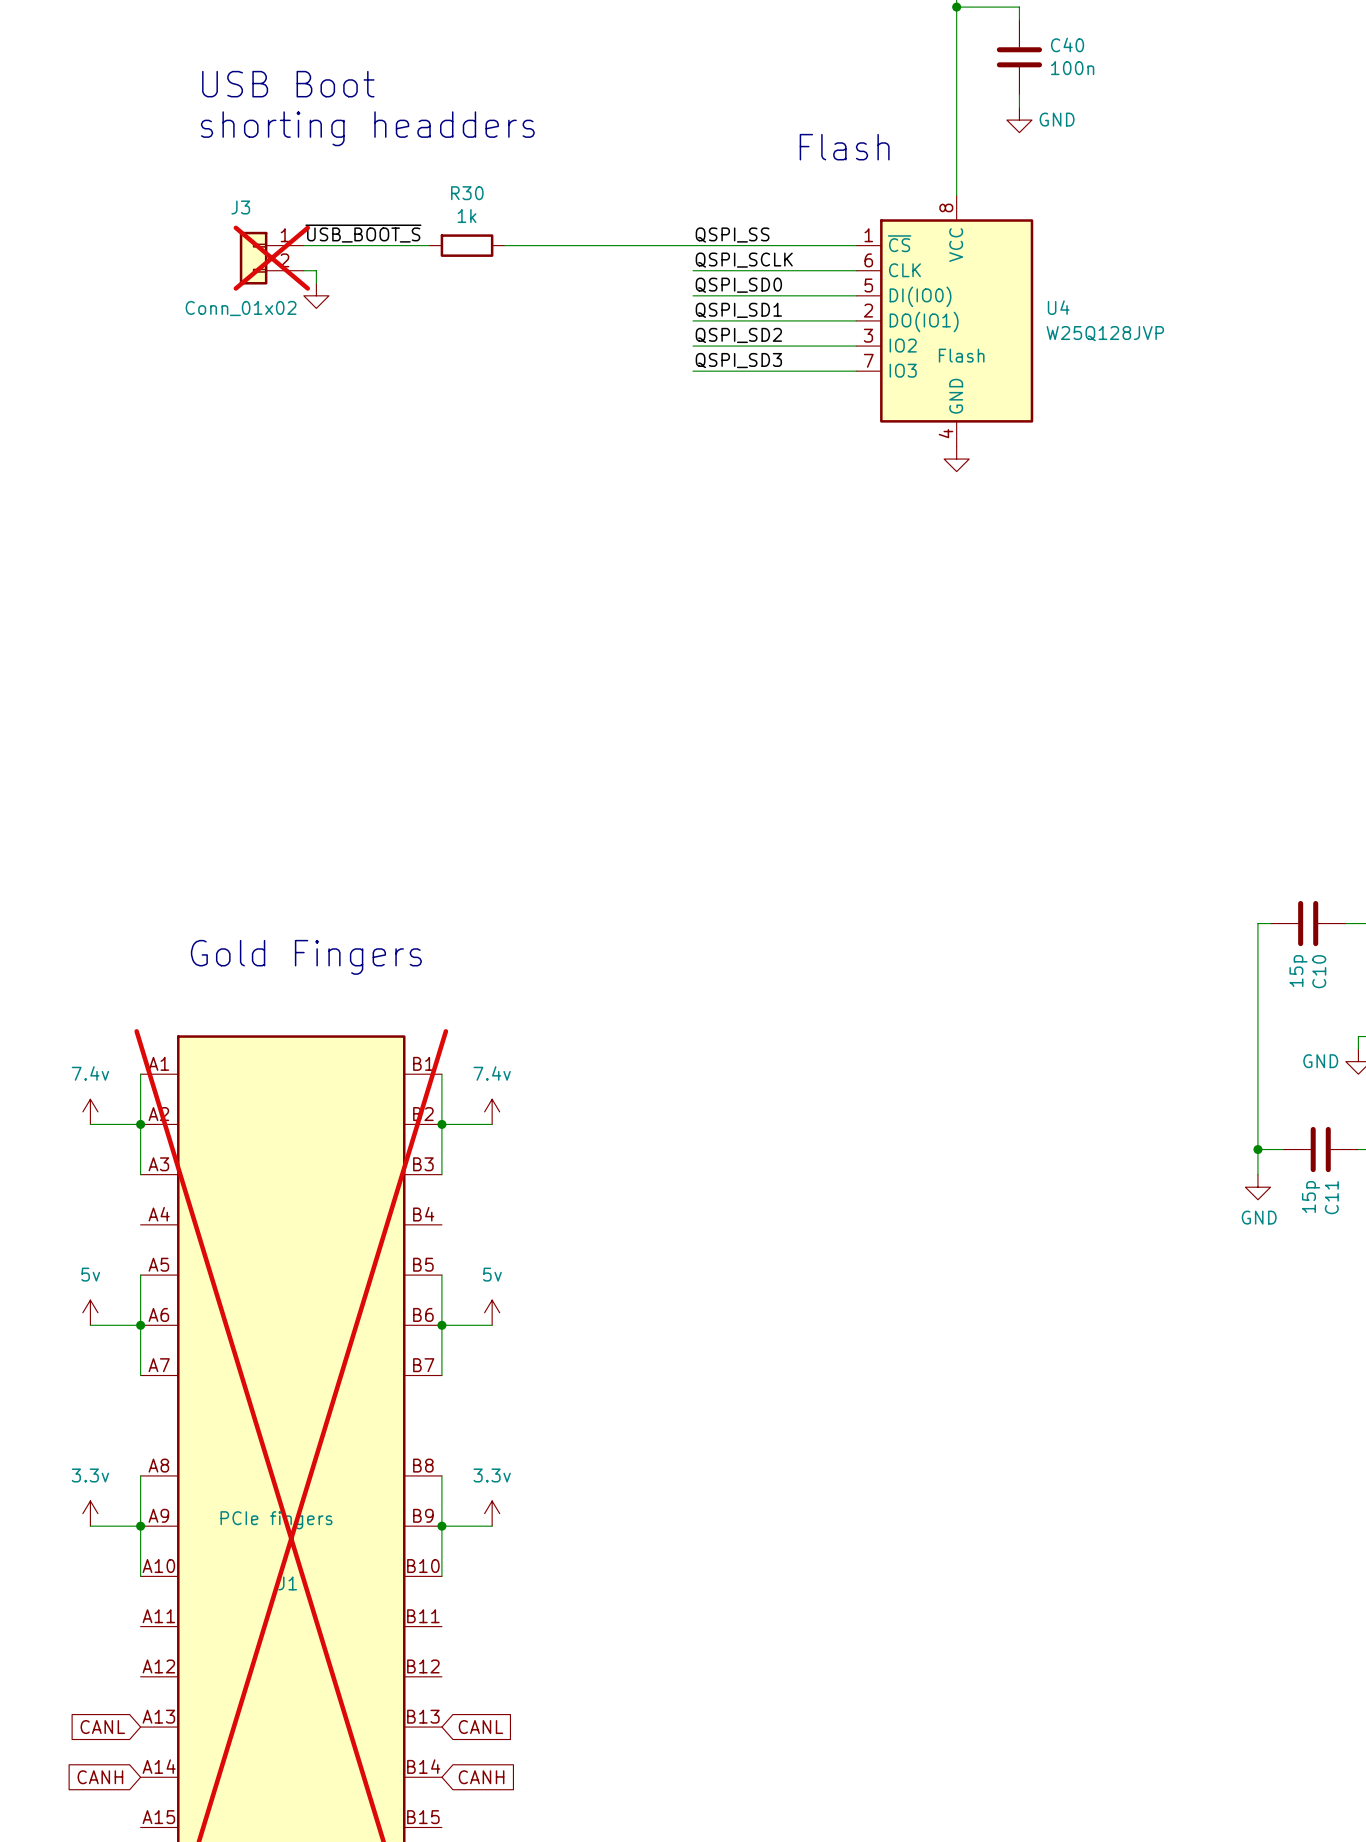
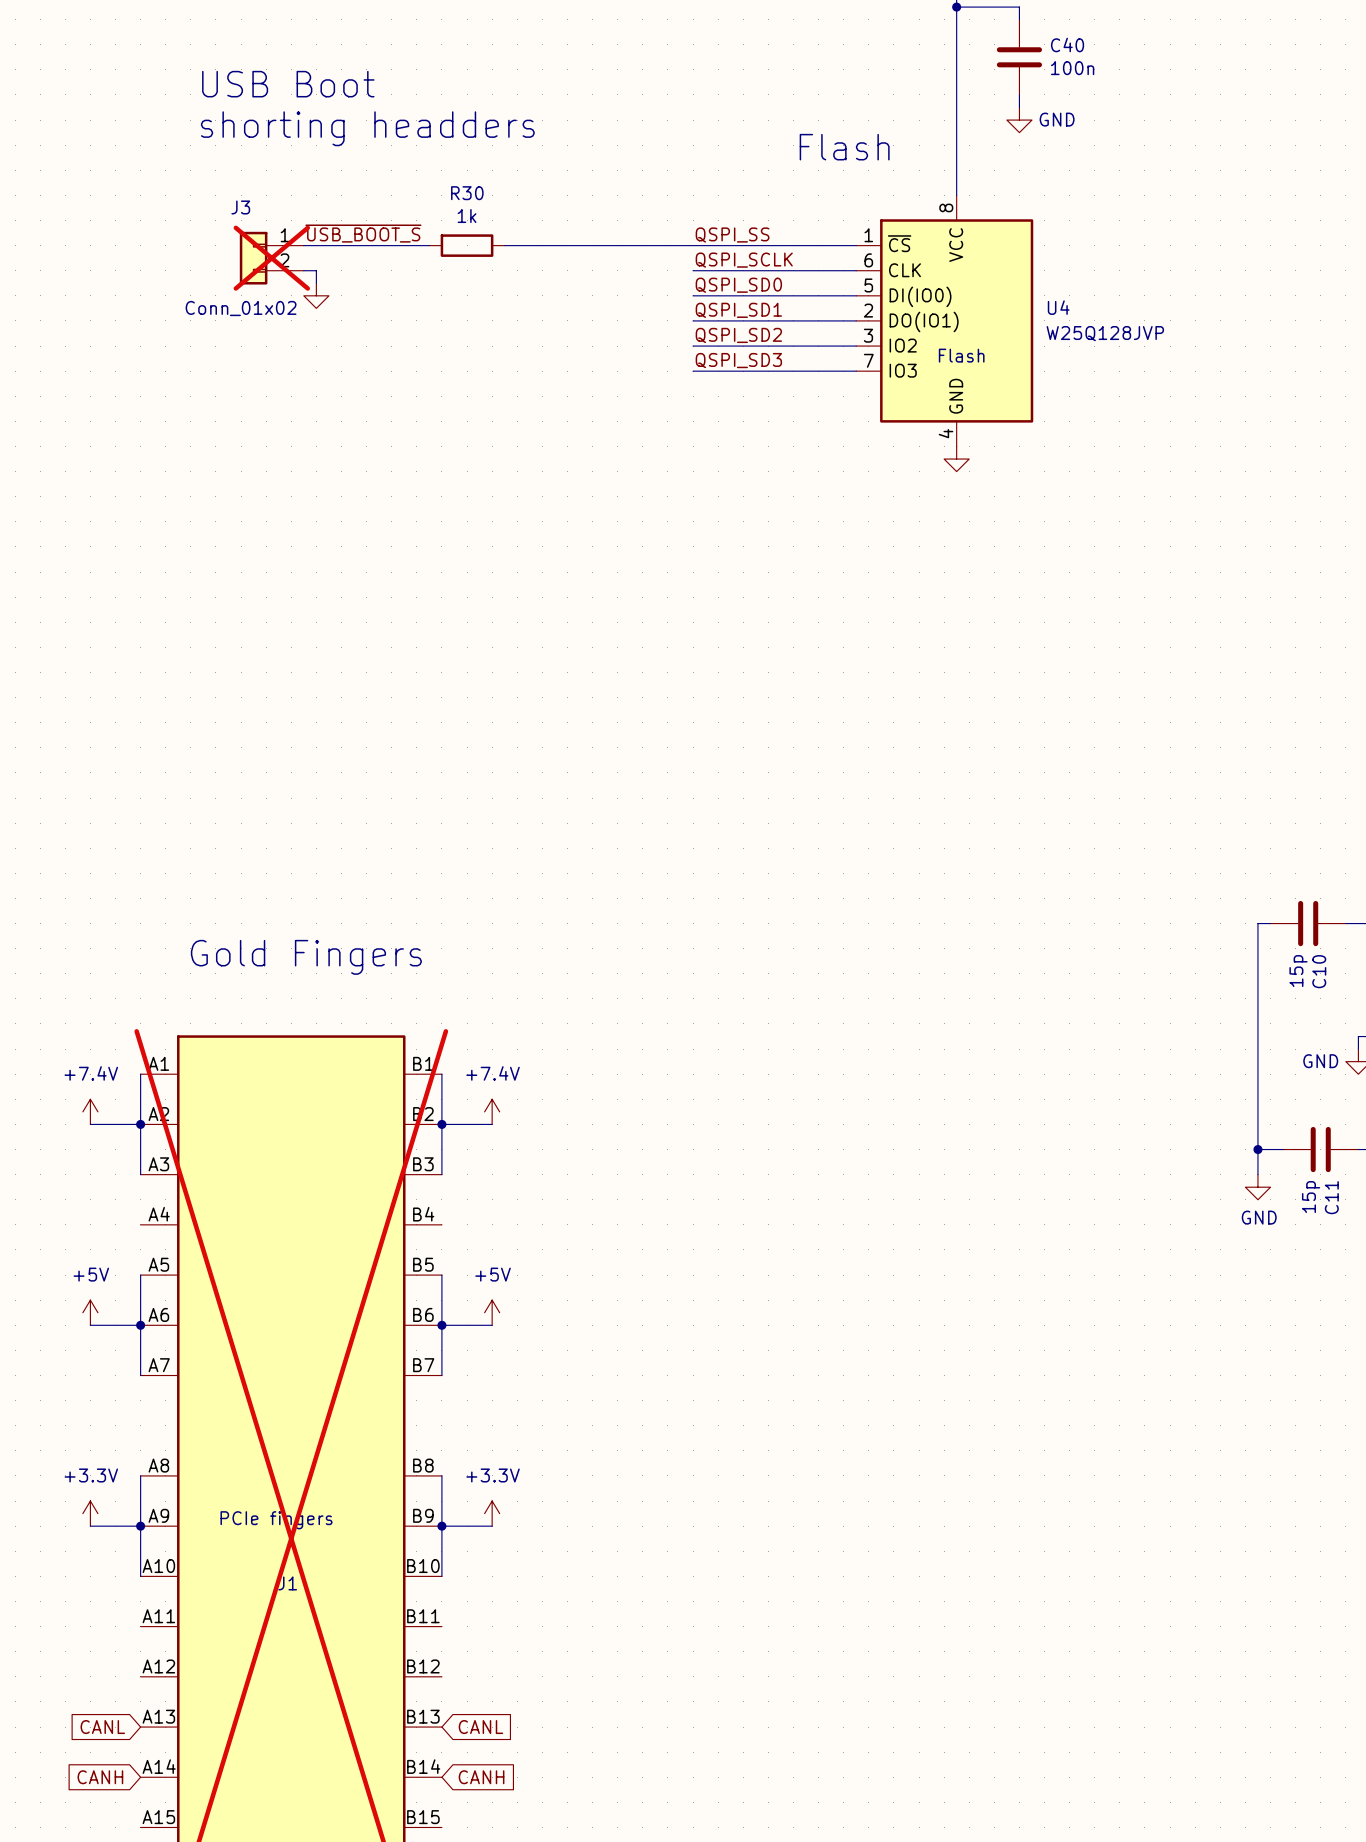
power symbol: 7.4v (90, 1111) -> +7.4V (90, 1111)
power symbol: 7.4v (492, 1111) -> +7.4V (492, 1111)
power symbol: 5v (90, 1312) -> +5V (90, 1312)
power symbol: 5v (492, 1312) -> +5V (492, 1312)
power symbol: 3.3v (90, 1513) -> +3.3V (90, 1513)
power symbol: 3.3v (492, 1513) -> +3.3V (492, 1513)

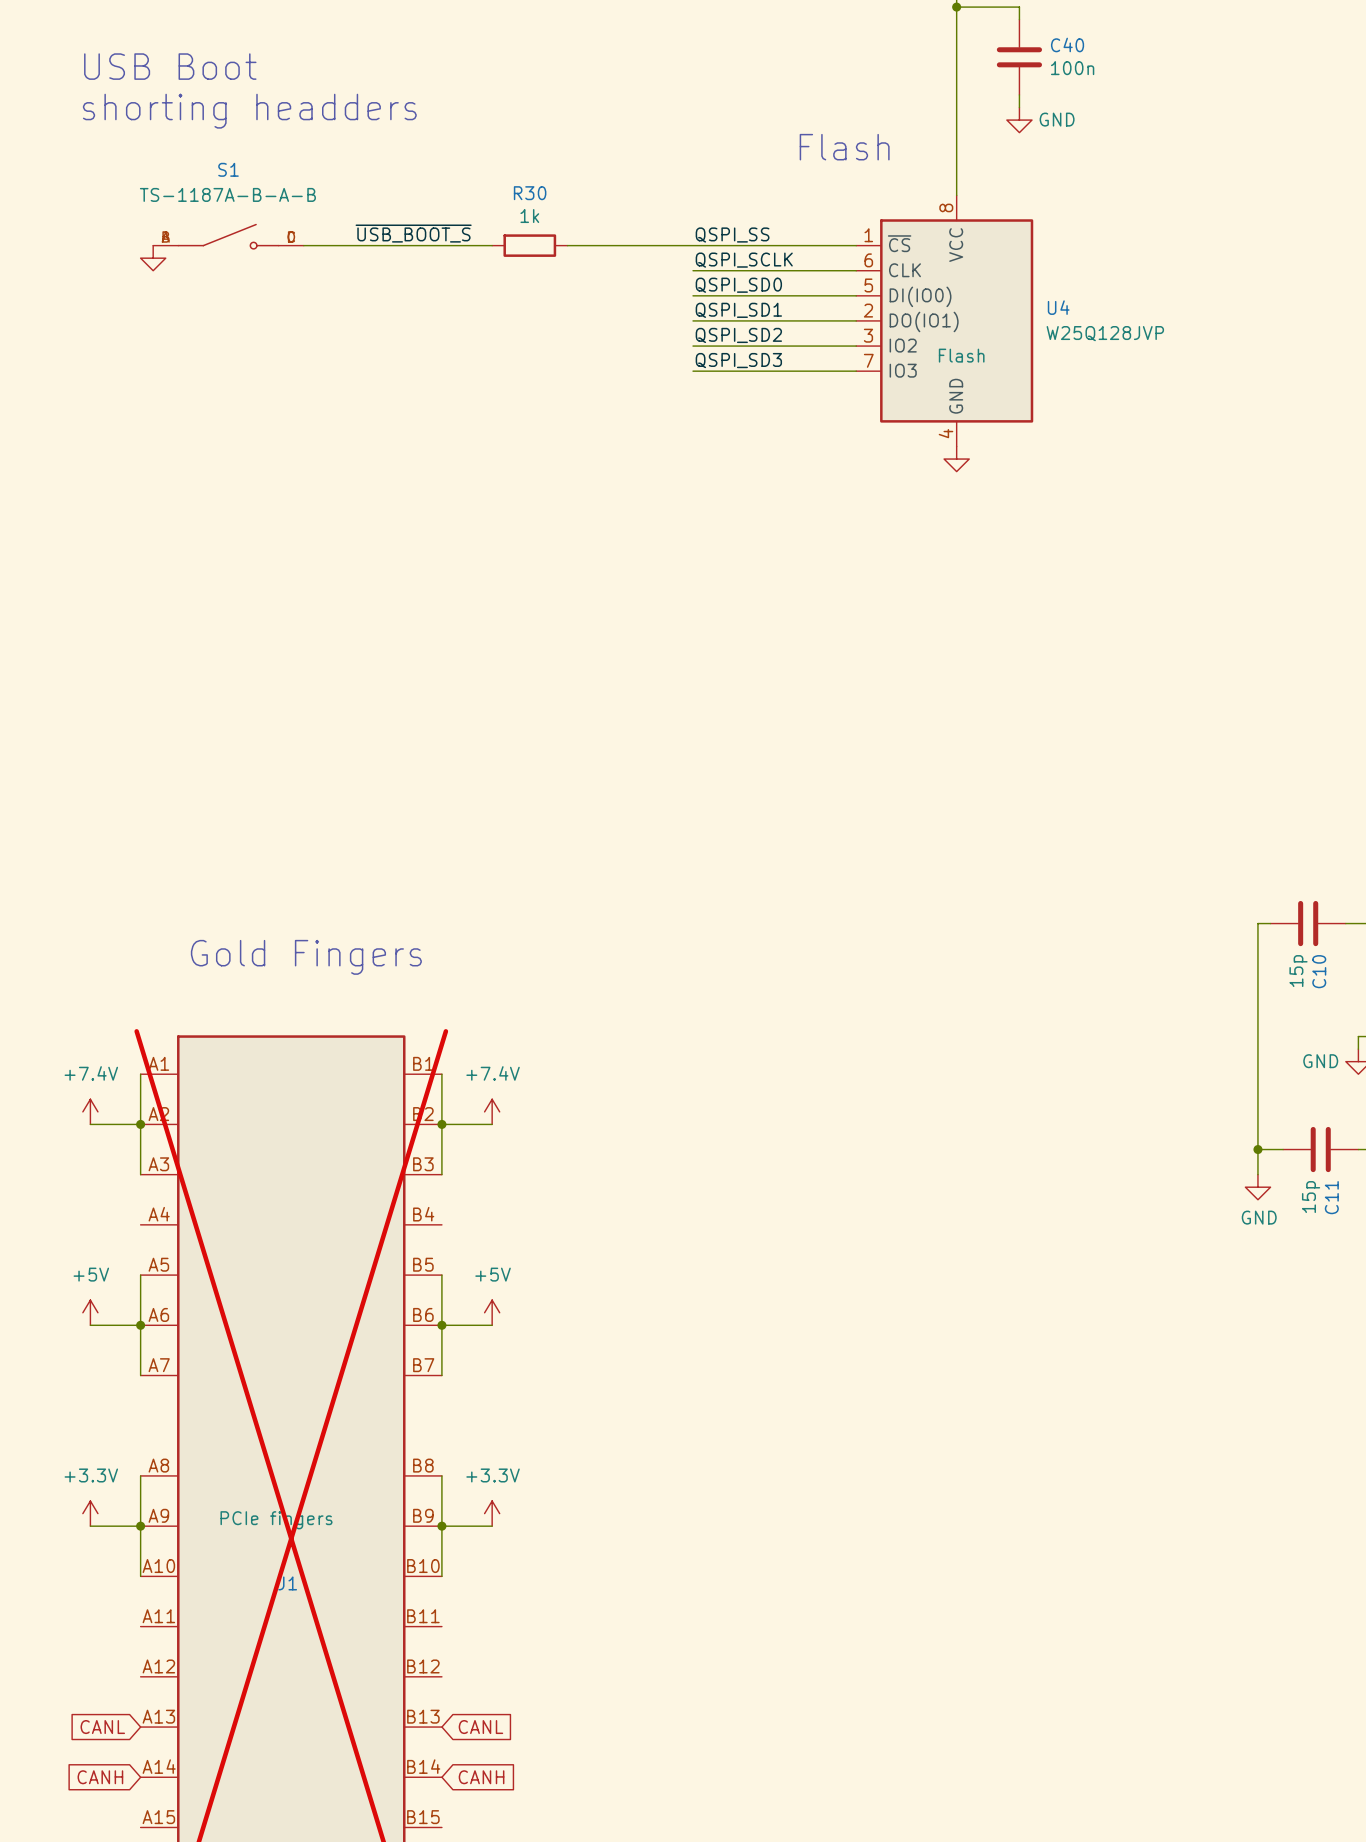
text position: USB Boot (288, 84) -> USB Boot (170, 66)
text position: shorting headders (367, 128) -> shorting headders (249, 111)
label position: ~{USB_BOOT_S} (363, 233) -> ~{USB_BOOT_S} (413, 233)
S1: none -> TS-1187A-B-A-B (228, 236)
R30 position: (467, 245) -> (529, 245)
wire: (504, 245) (567, 245) -> (429, 245) (492, 245)
J3: Conn_01x02 (271, 258) -> none
wire: (303, 270) (316, 270) (316, 283) -> none
power symbol position: (316, 295) -> (153, 258)

